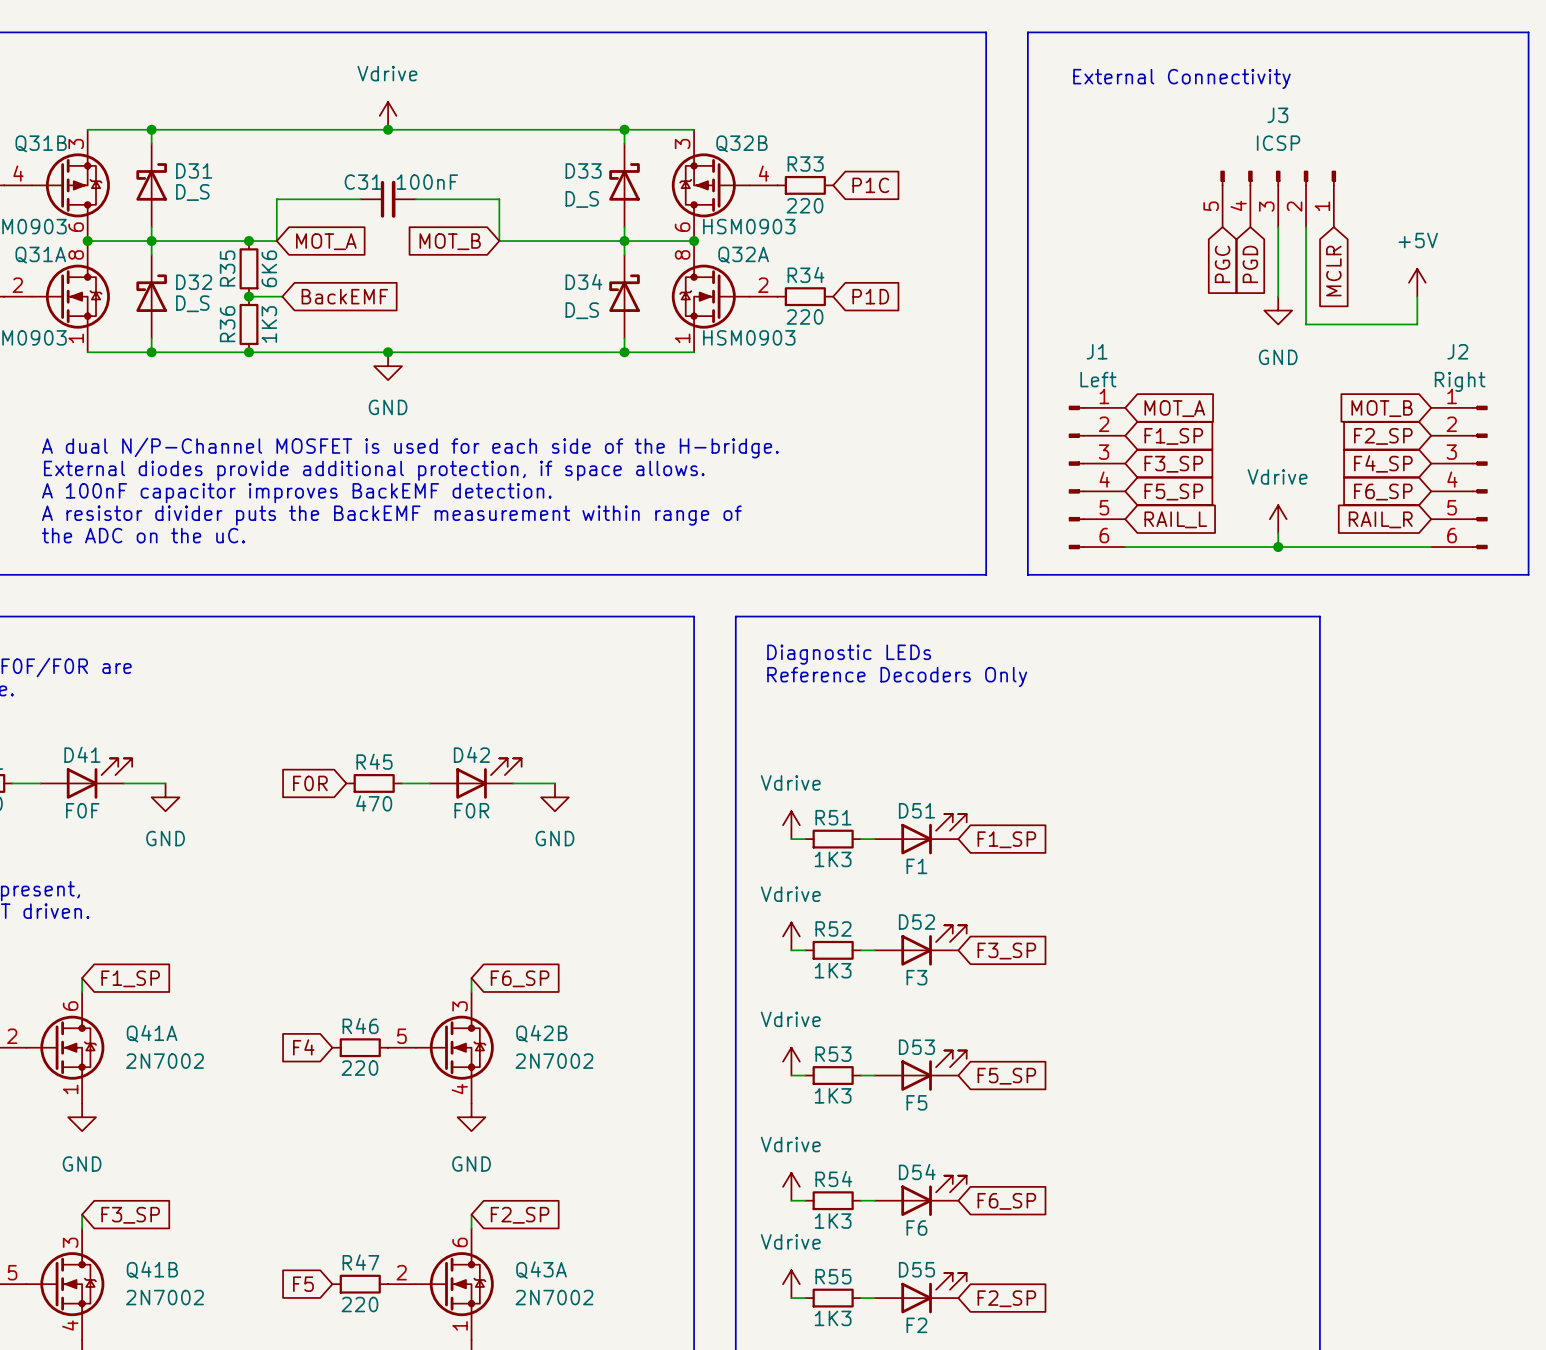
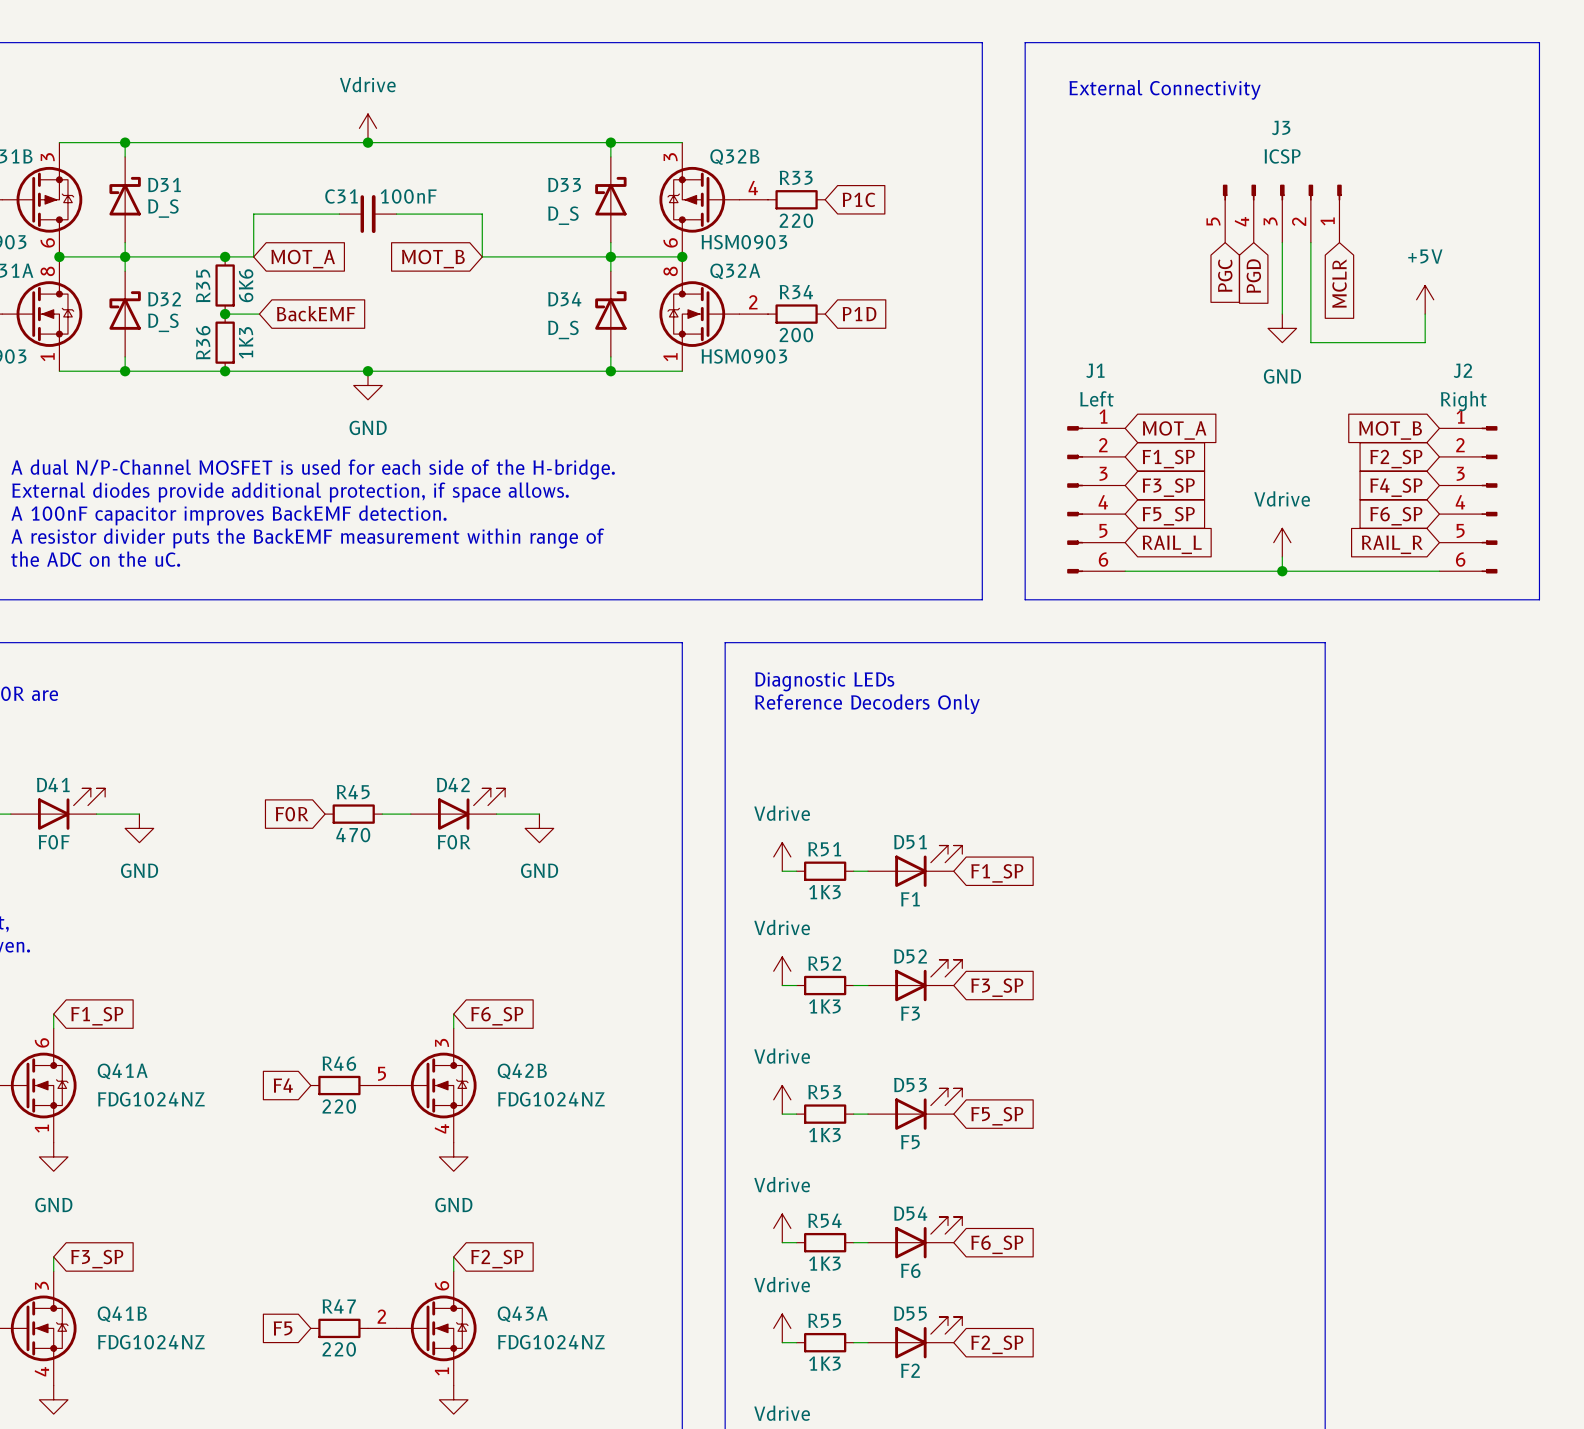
R34 value: 220 (805, 317) -> 200 (796, 335)
Q41A value: 2N7002 (164, 1061) -> FDG1024NZ (151, 1099)
Q42B value: 2N7002 (554, 1061) -> FDG1024NZ (551, 1099)
Q41B value: 2N7002 (164, 1297) -> FDG1024NZ (151, 1342)
Q43A value: 2N7002 (554, 1297) -> FDG1024NZ (551, 1342)

